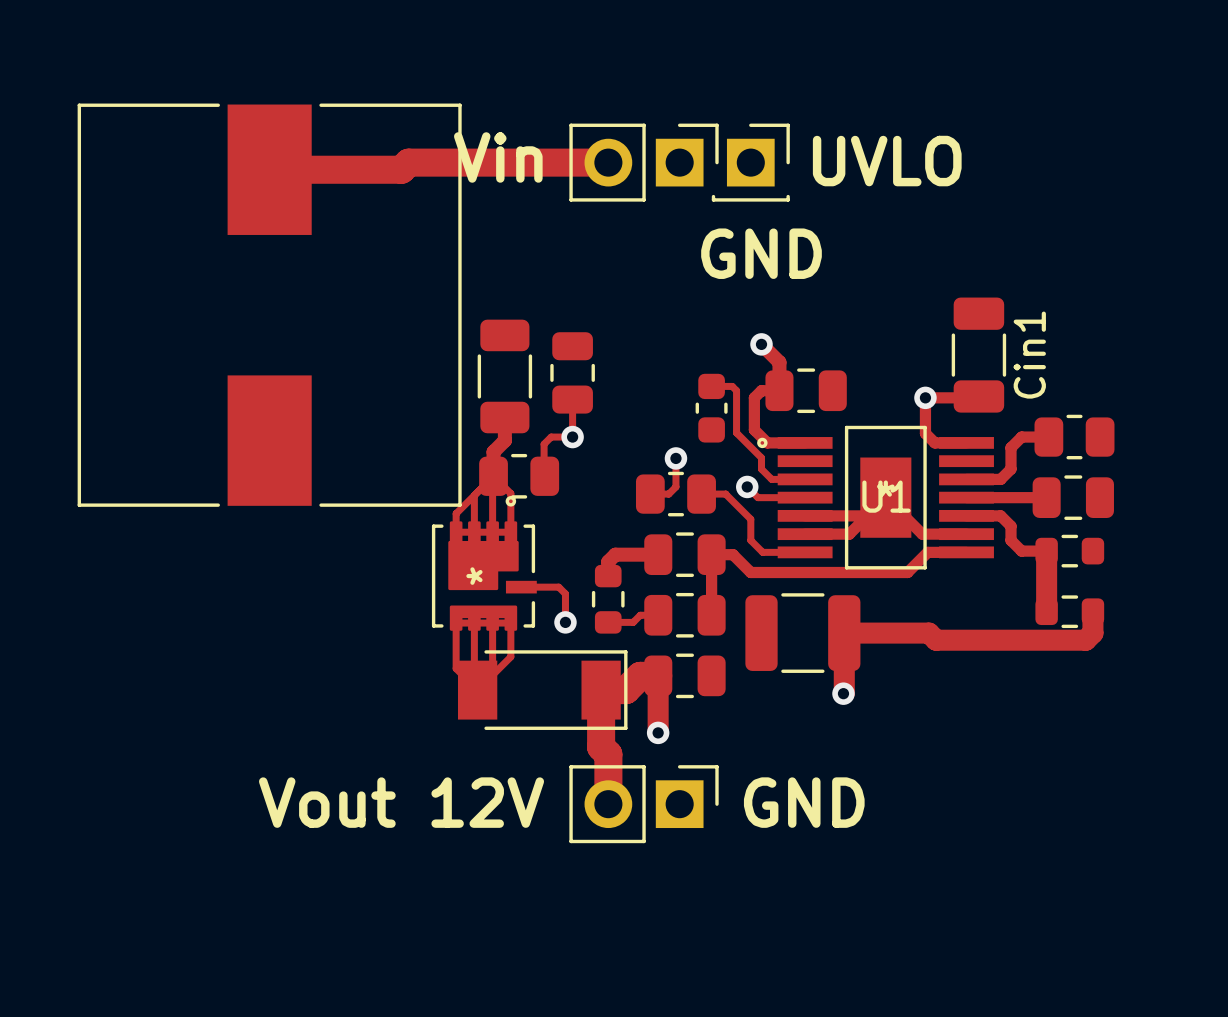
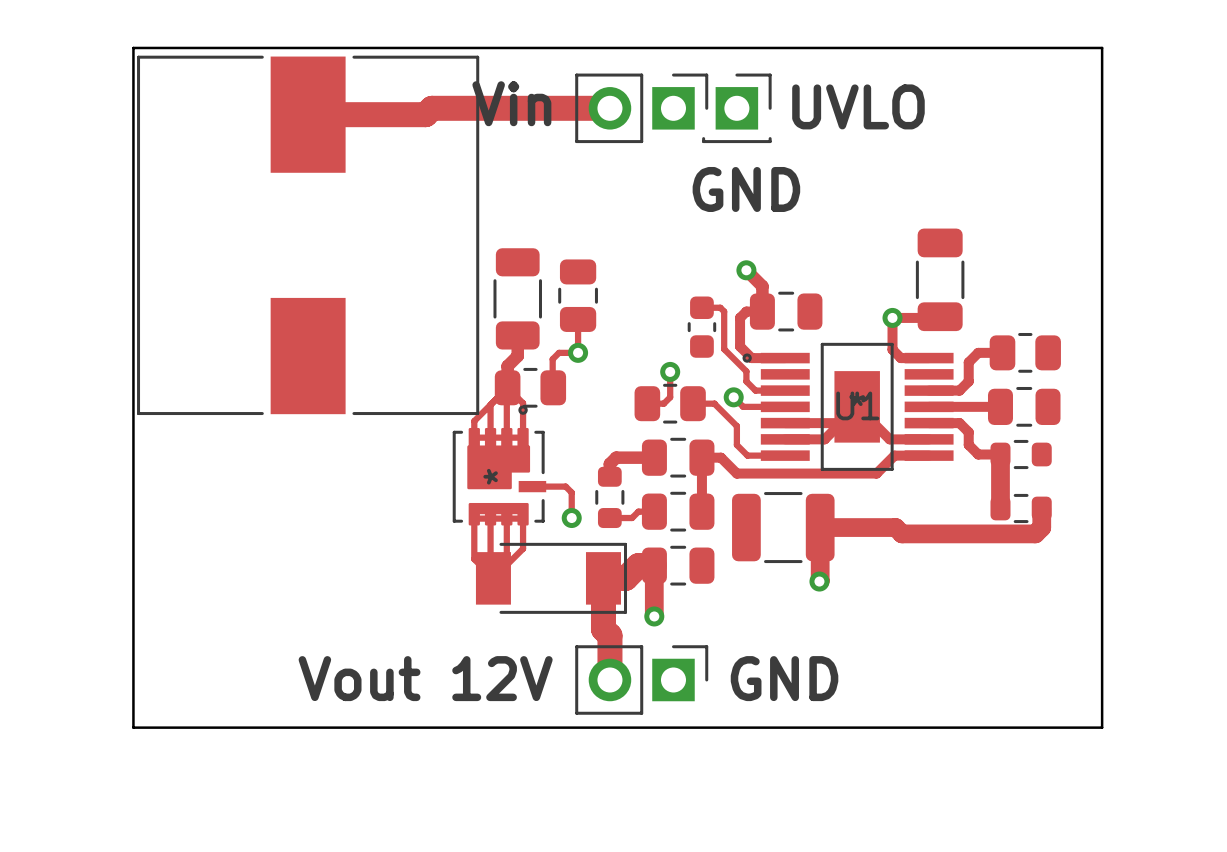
board edge: none -> (133, 47) (1102, 47) (1102, 727) (133, 727) (133, 47)
Cin1 name: Cin1 (1029, 355) -> none

